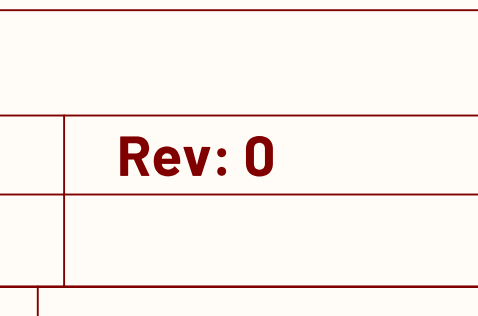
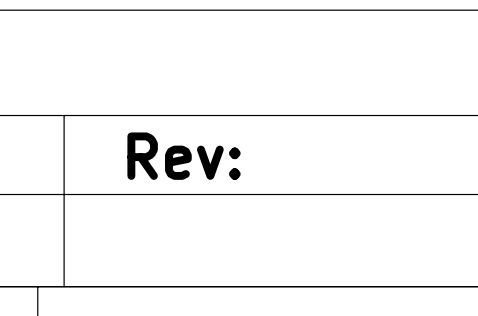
title block: Rev: 0 (196, 156) -> Rev: (184, 156)

